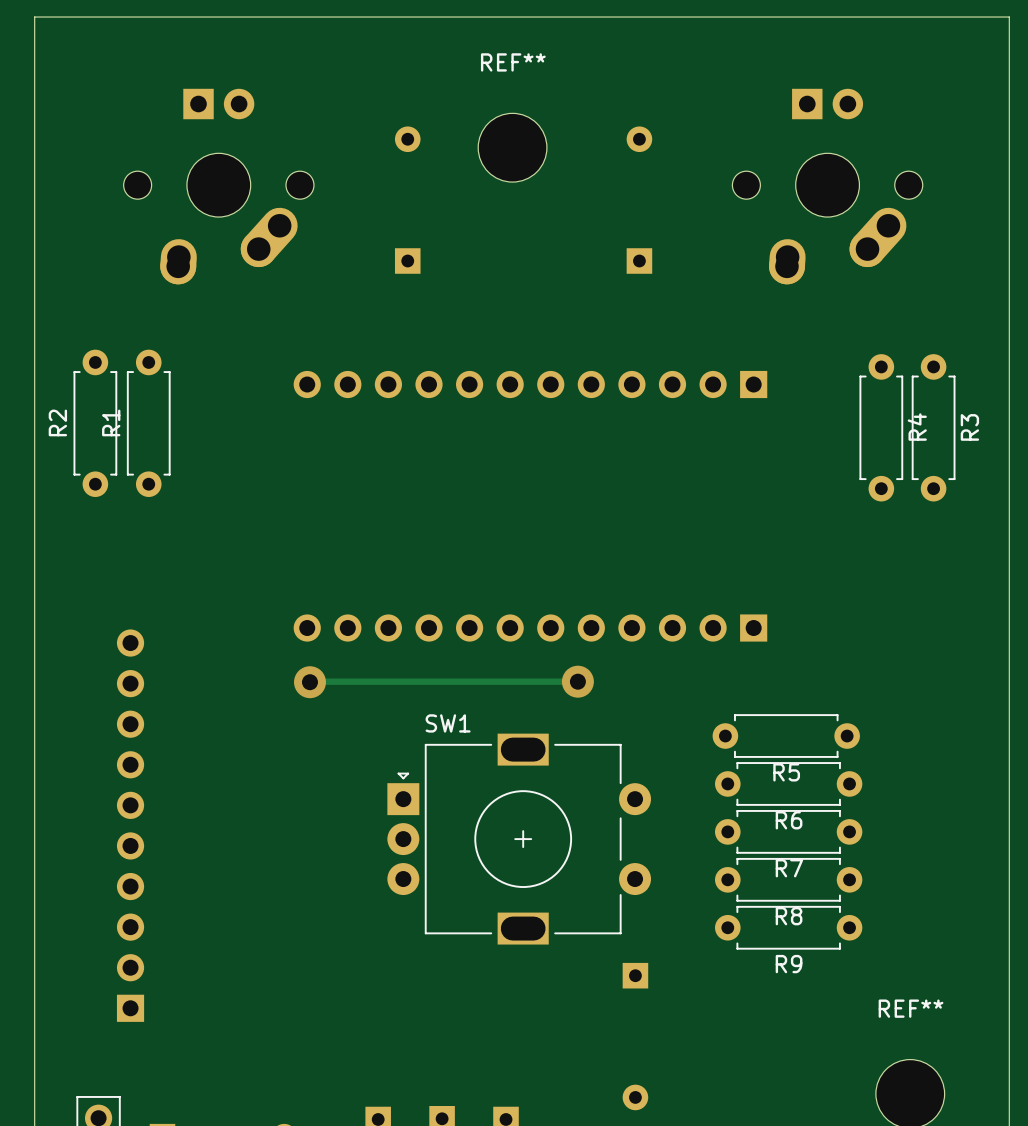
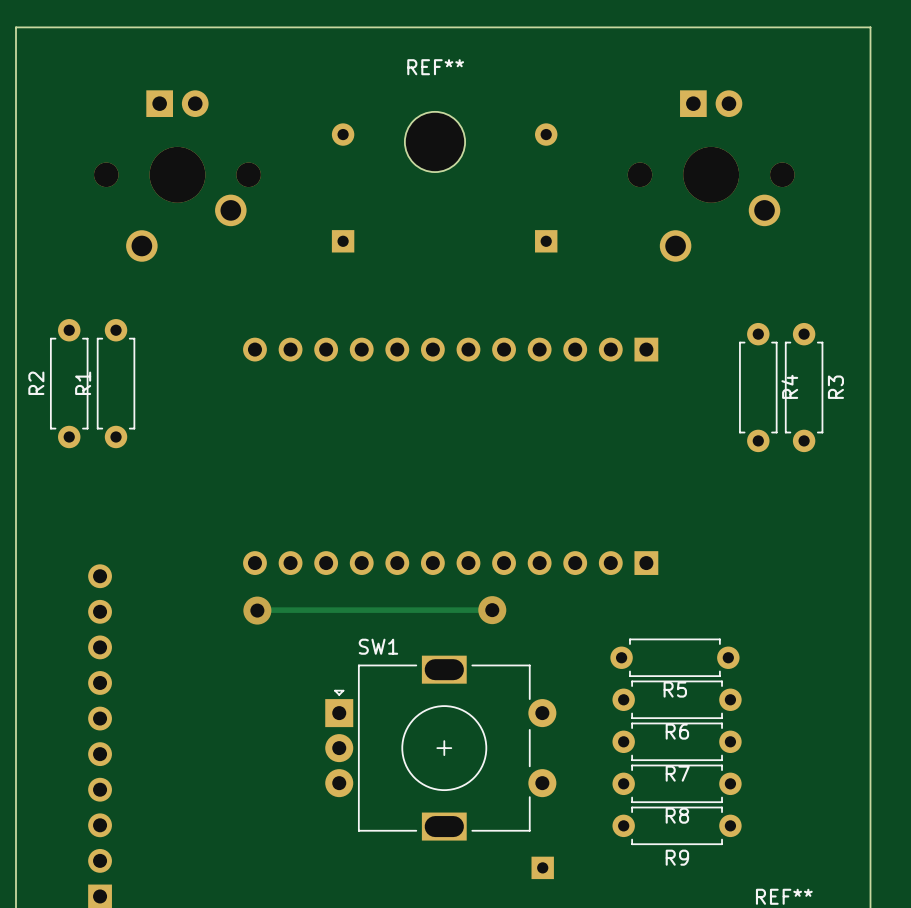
part footprint: [123, 88, 314, 285] -> [94, 90, 261, 262]
part footprint: [732, 88, 923, 285] -> [627, 90, 795, 262]

